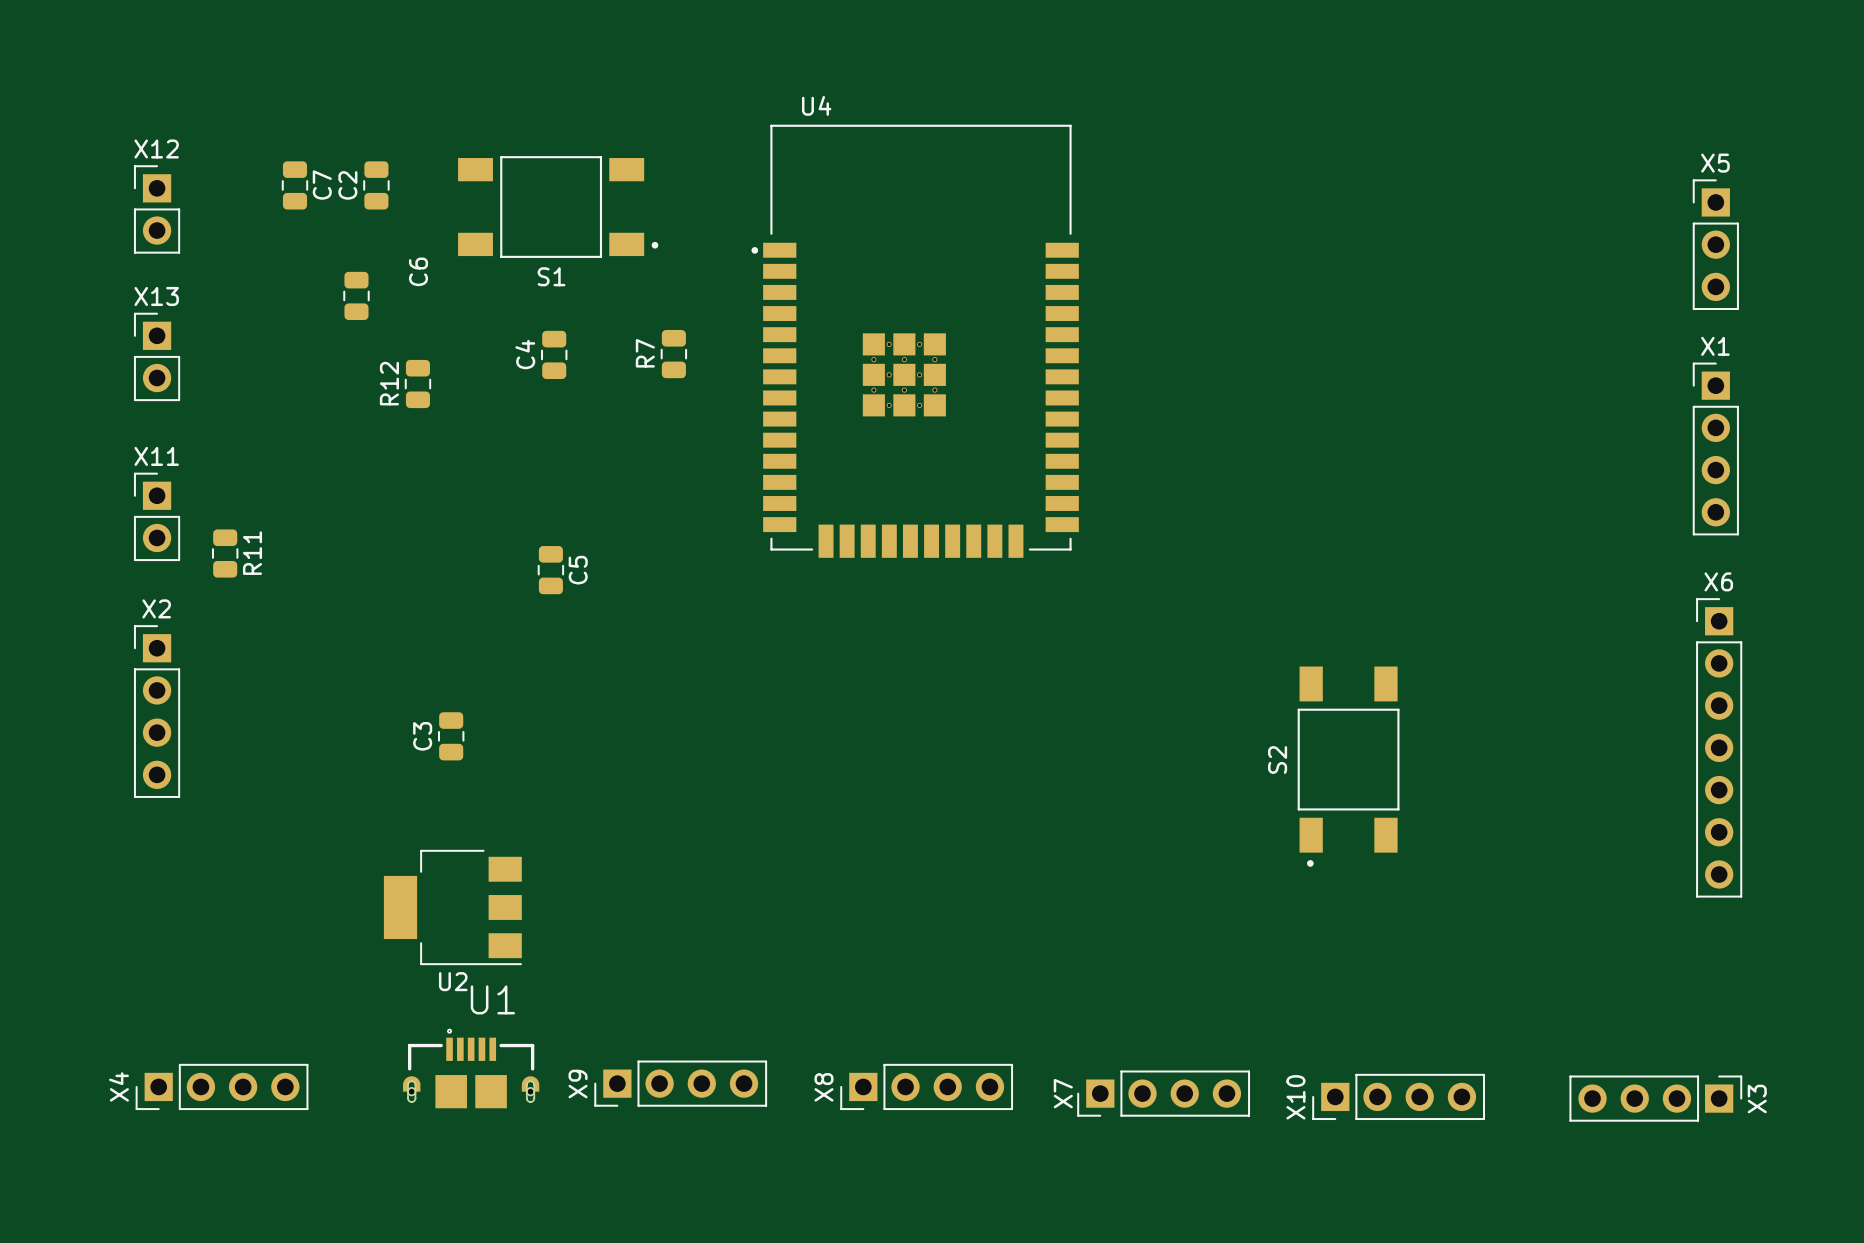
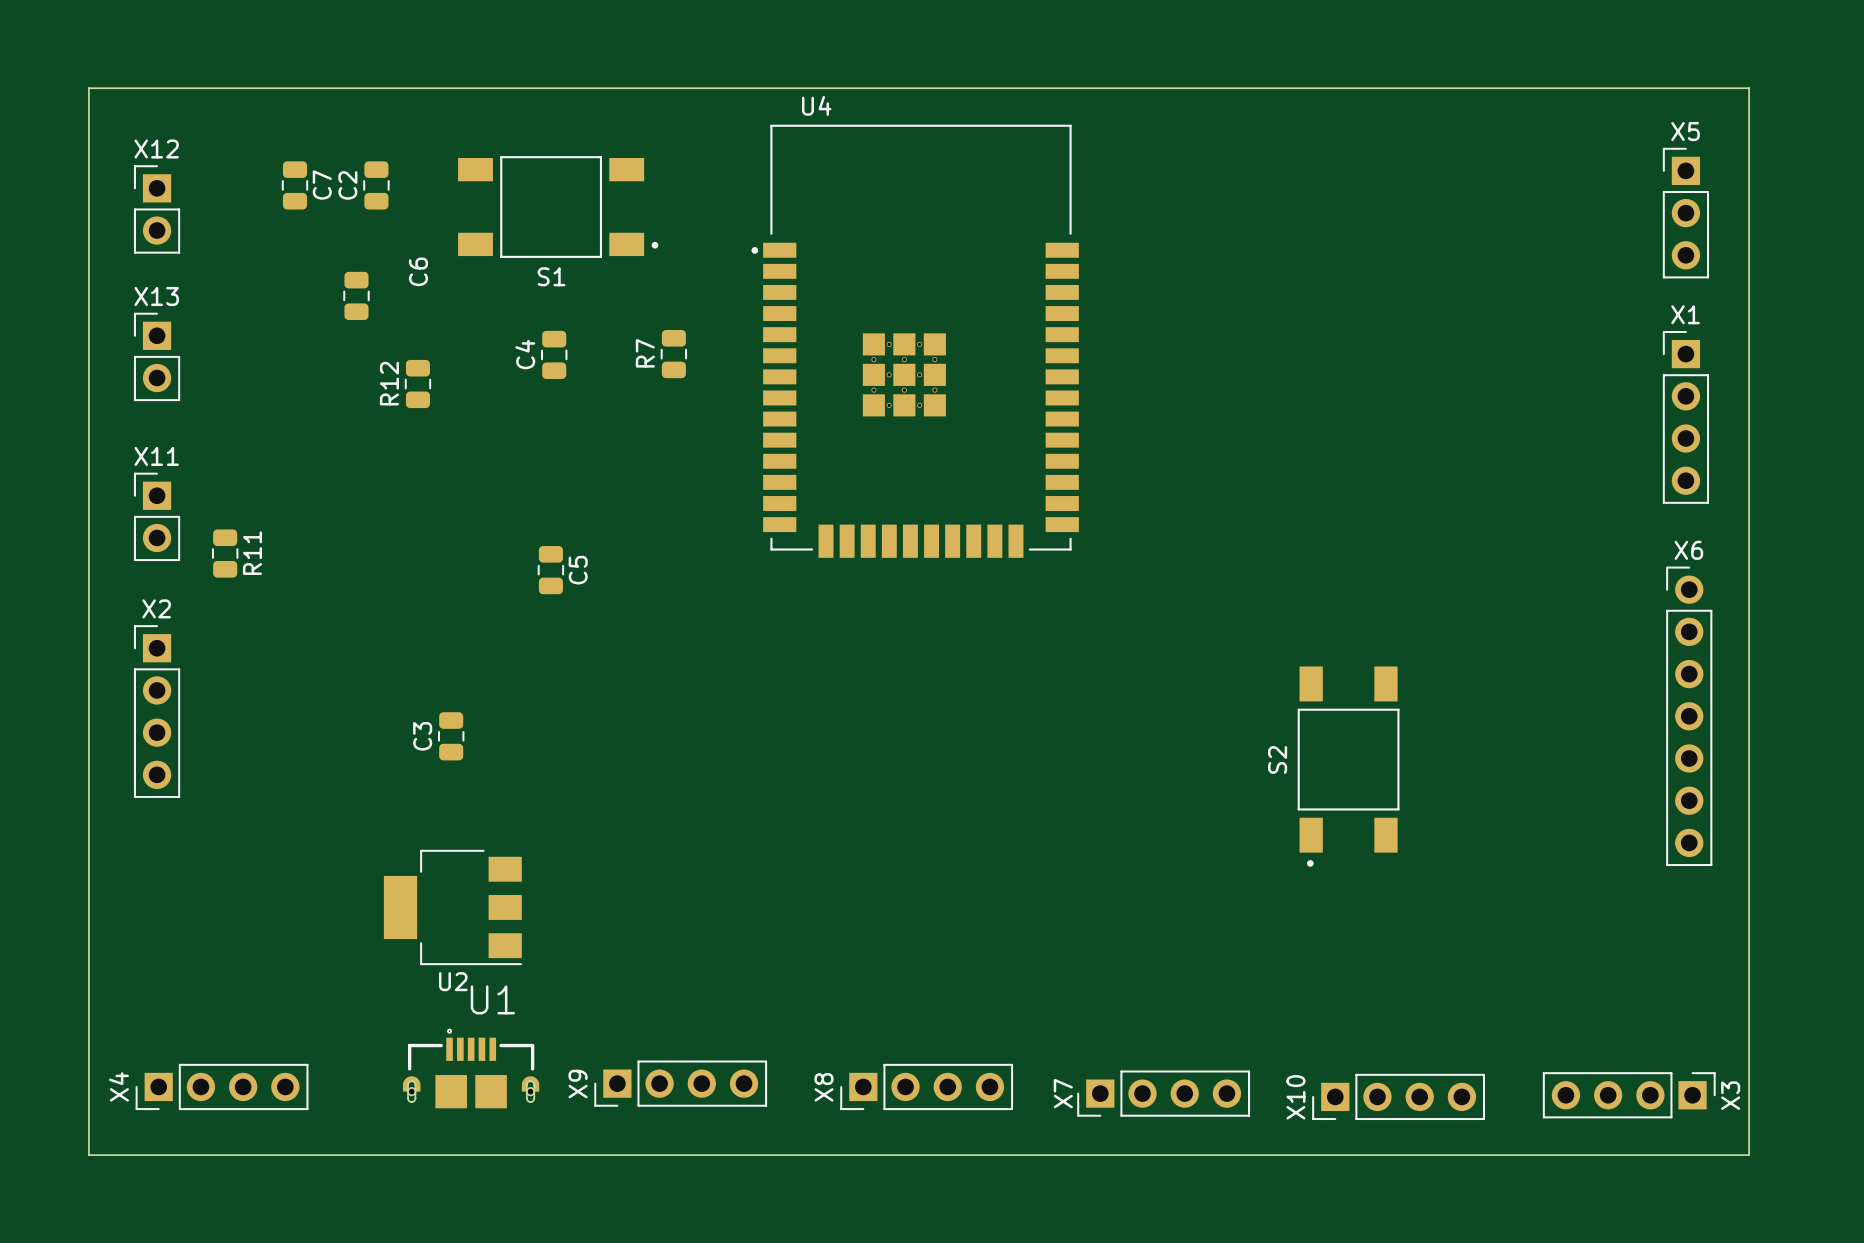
board edge: none -> (88, 88) (1749, 88) (1749, 1155) (88, 1155) (88, 88)
X5 position: (1715, 244) -> (1685, 213)
X1 position: (1715, 448) -> (1685, 417)
X6 footprint: [1696, 598, 1743, 898] -> [1666, 566, 1713, 867]
X3 position: (1655, 1098) -> (1629, 1095)

